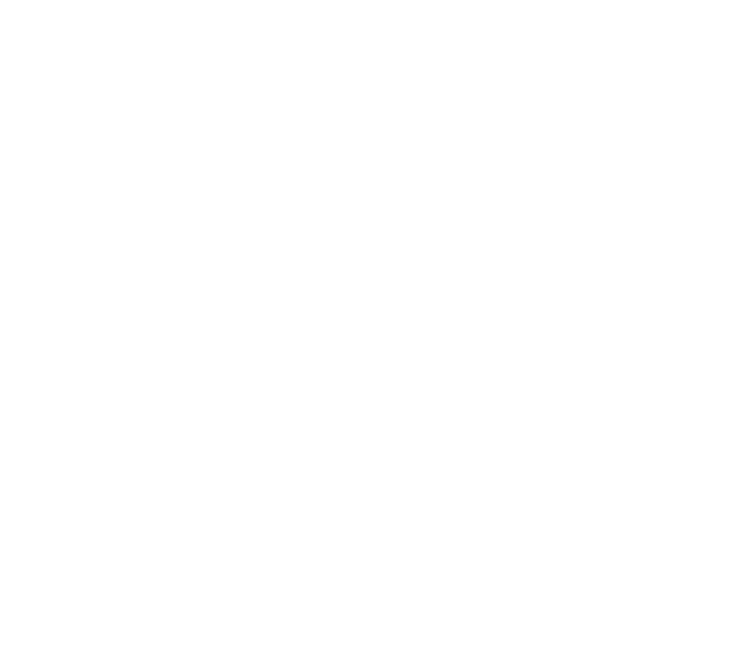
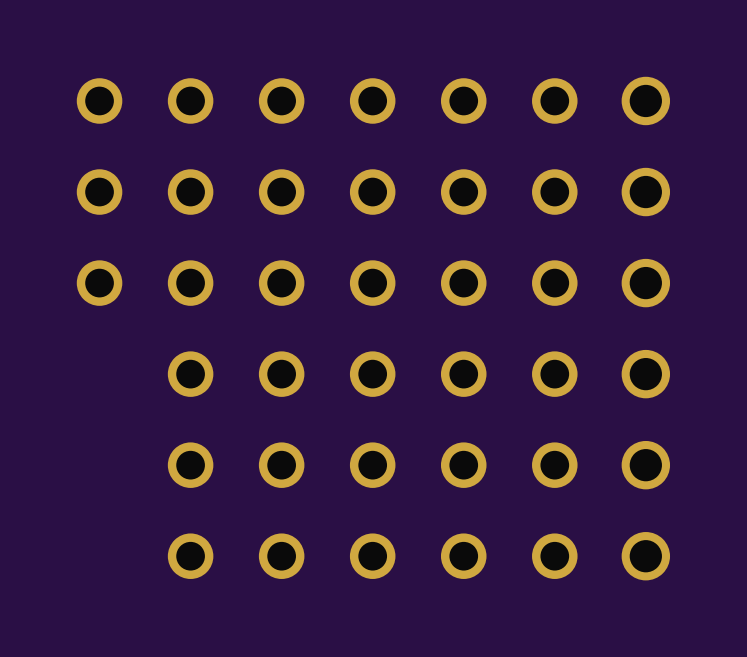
via: none -> (99, 100)
via: none -> (190, 100)
via: none -> (281, 100)
via: none -> (372, 100)
via: none -> (463, 100)
via: none -> (554, 100)
via: none -> (645, 100)
via: none -> (99, 192)
via: none -> (190, 192)
via: none -> (281, 192)
via: none -> (372, 192)
via: none -> (463, 192)
via: none -> (554, 192)
via: none -> (645, 192)
via: none -> (99, 283)
via: none -> (190, 283)
via: none -> (281, 283)
via: none -> (372, 283)
via: none -> (463, 283)
via: none -> (554, 283)
via: none -> (645, 283)
via: none -> (190, 374)
via: none -> (281, 374)
via: none -> (372, 374)
via: none -> (463, 374)
via: none -> (554, 374)
via: none -> (645, 374)
via: none -> (190, 465)
via: none -> (281, 465)
via: none -> (372, 465)
via: none -> (463, 465)
via: none -> (554, 465)
via: none -> (645, 465)
via: none -> (190, 556)
via: none -> (281, 556)
via: none -> (372, 556)
via: none -> (463, 556)
via: none -> (554, 556)
via: none -> (645, 556)

